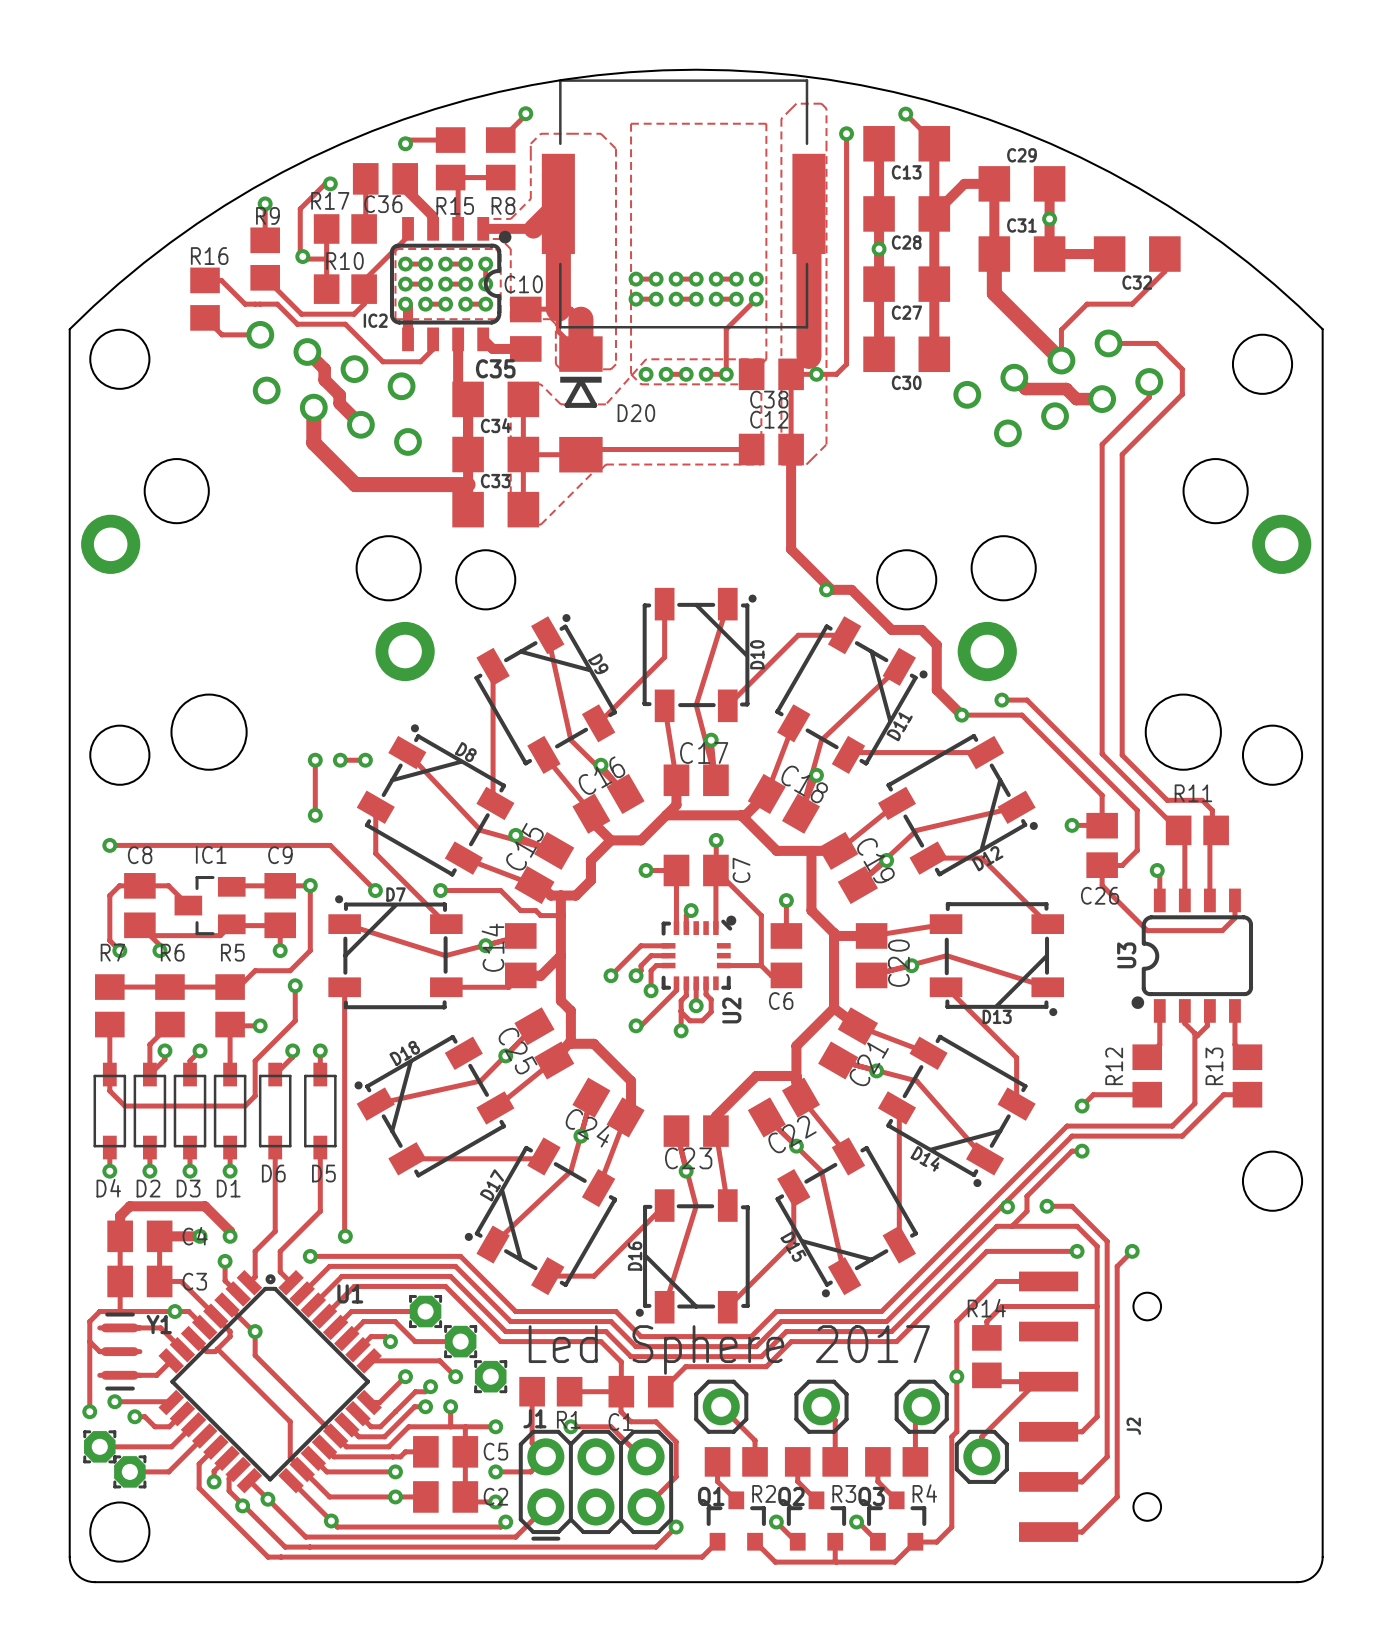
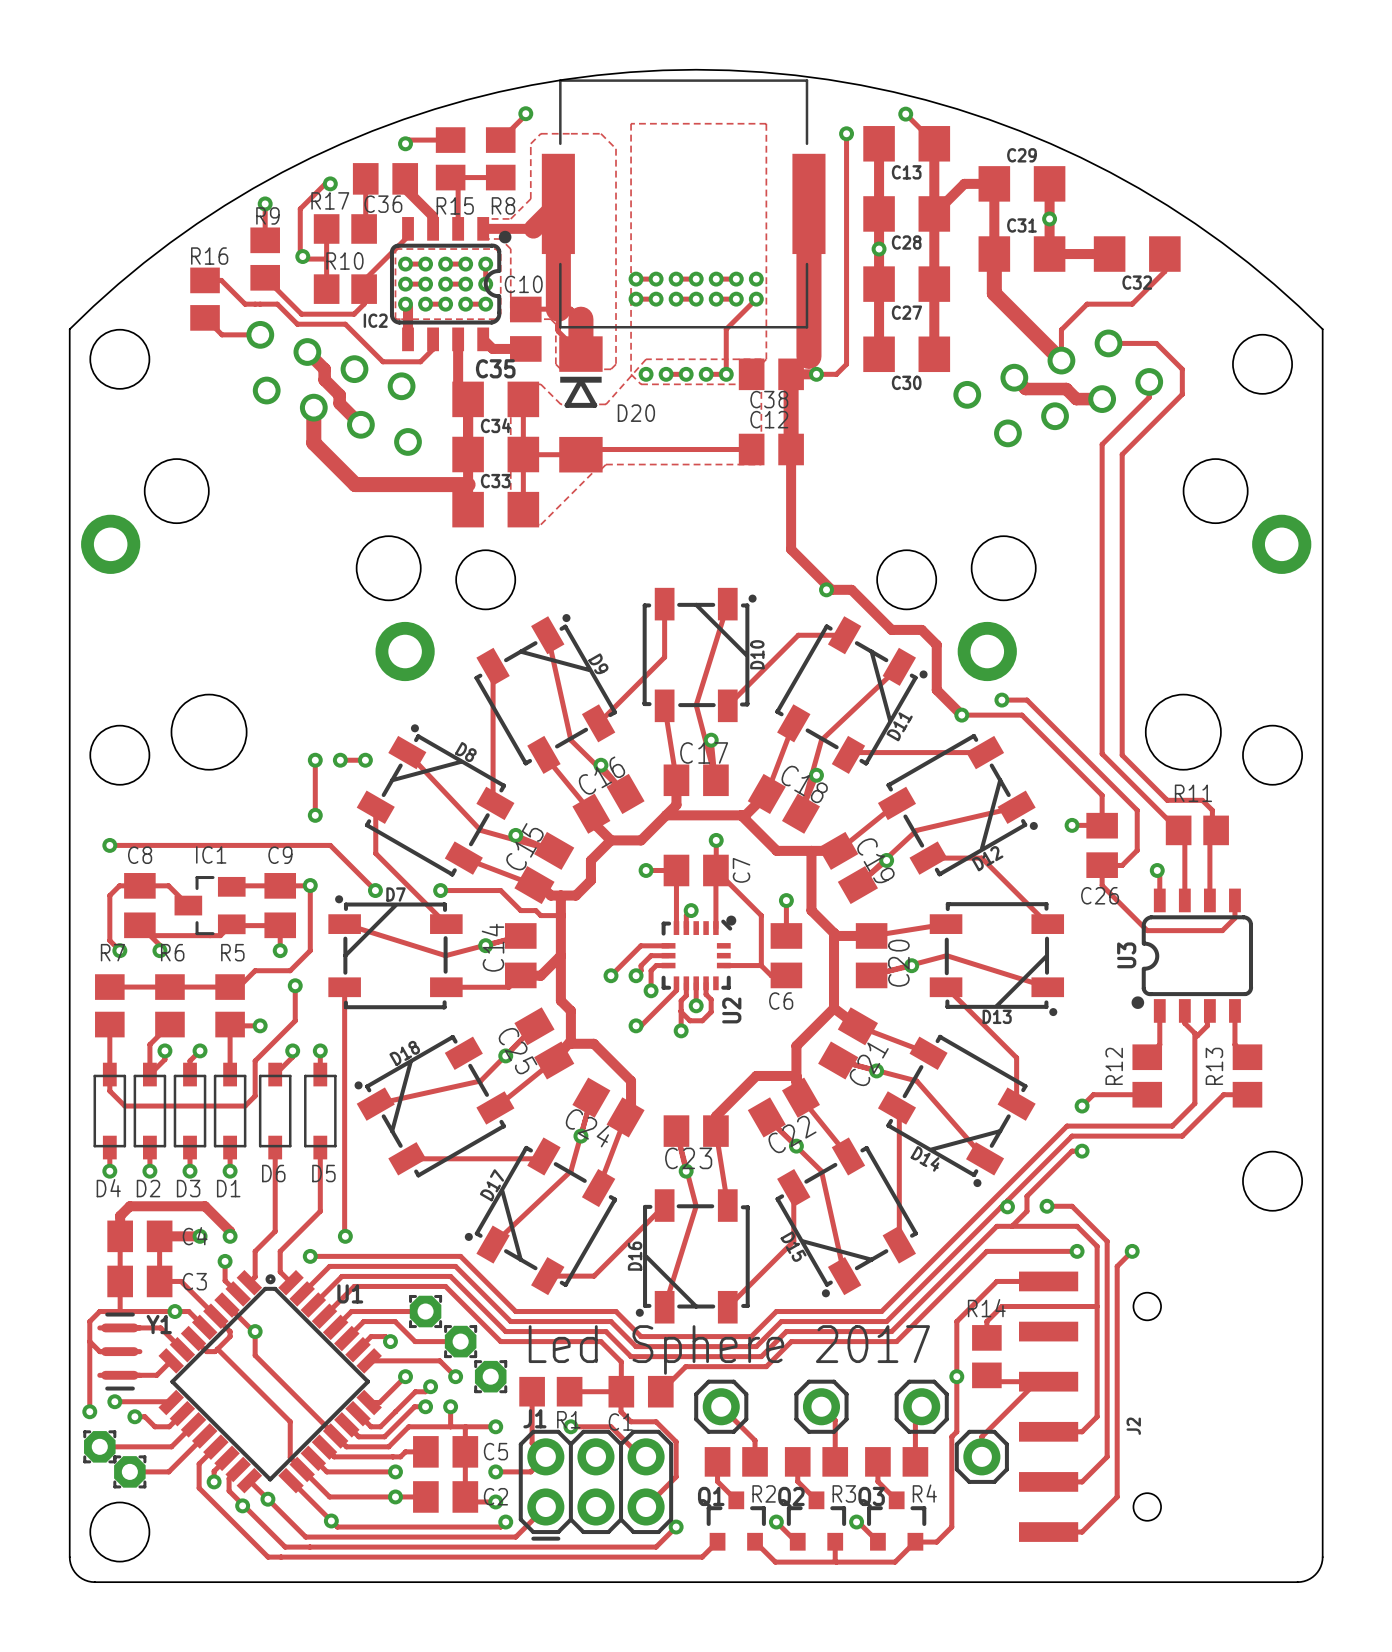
zone outline: (796, 103) (821, 103) (826, 108) (826, 444) (806, 464) (781, 464) (781, 118) (796, 103) -> none
track width: thin (816, 374) (791, 374) (791, 449) -> thick (816, 374) (791, 374) (791, 449)

